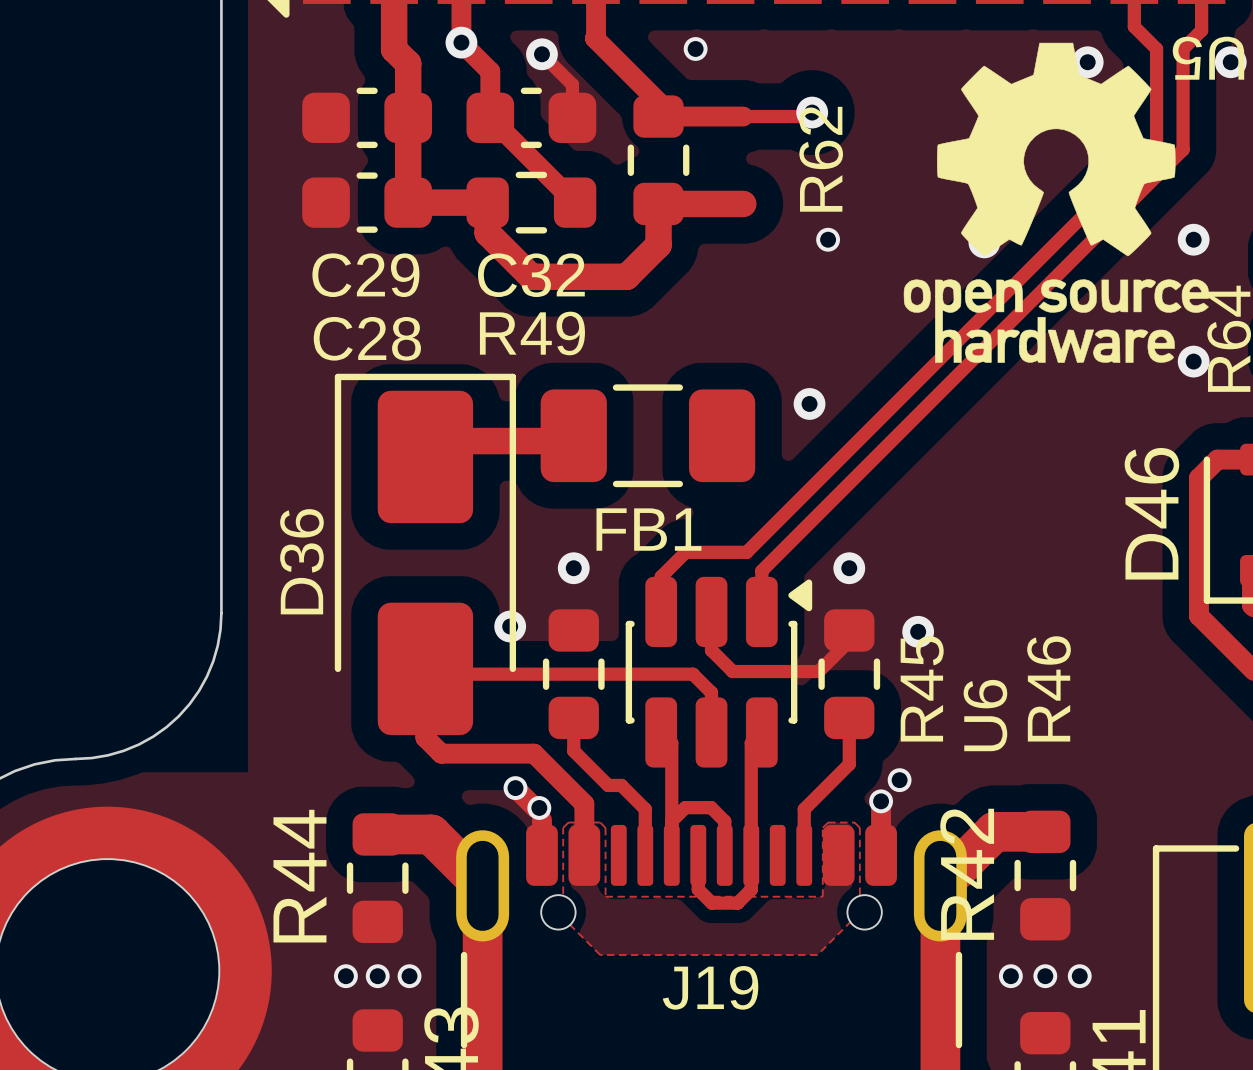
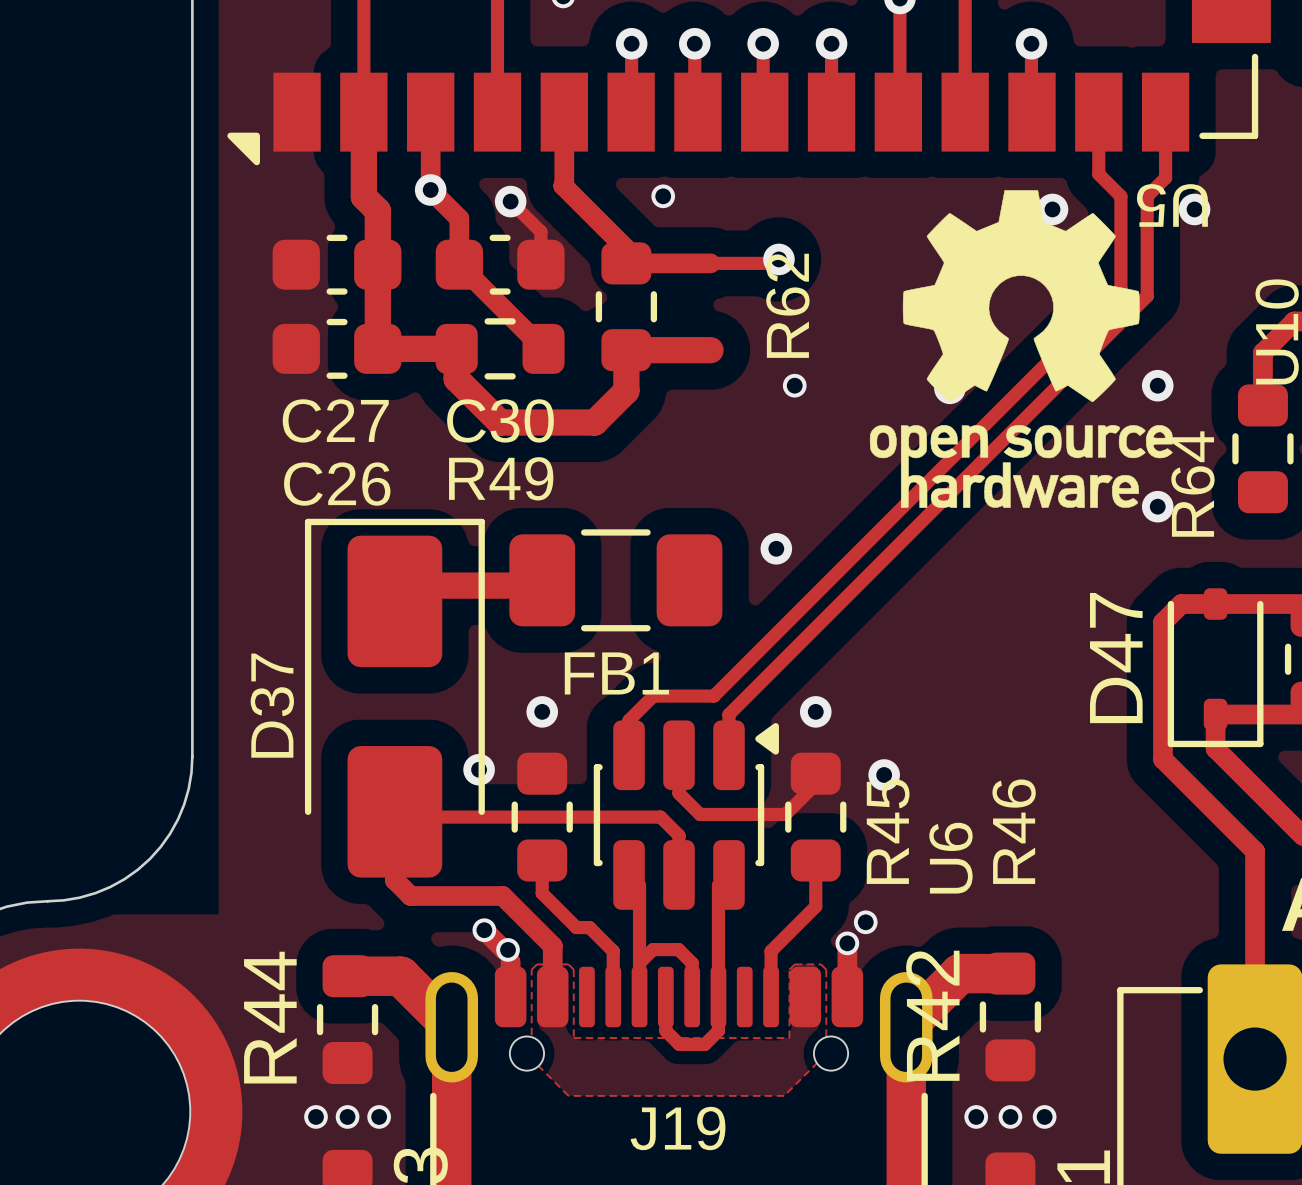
C29 name: C29 (365, 275) -> C27 (335, 420)
C32 name: C32 (531, 275) -> C30 (500, 420)
C28 name: C28 (367, 338) -> C26 (337, 484)
D46 name: D46 (1151, 513) -> D47 (1116, 658)
D36 name: D36 (301, 561) -> D37 (272, 705)

